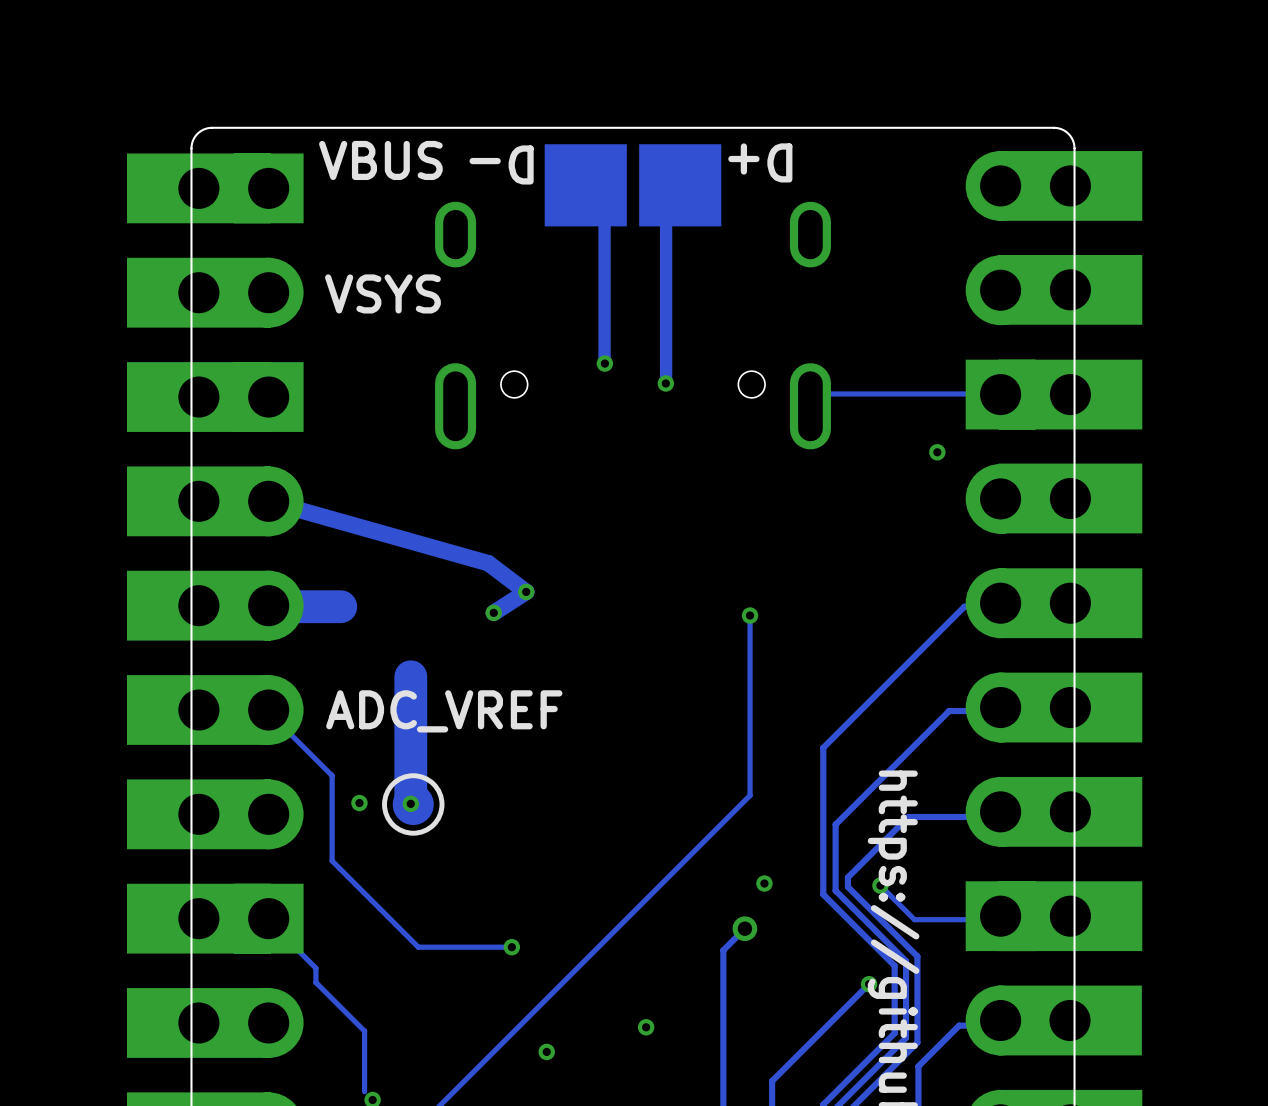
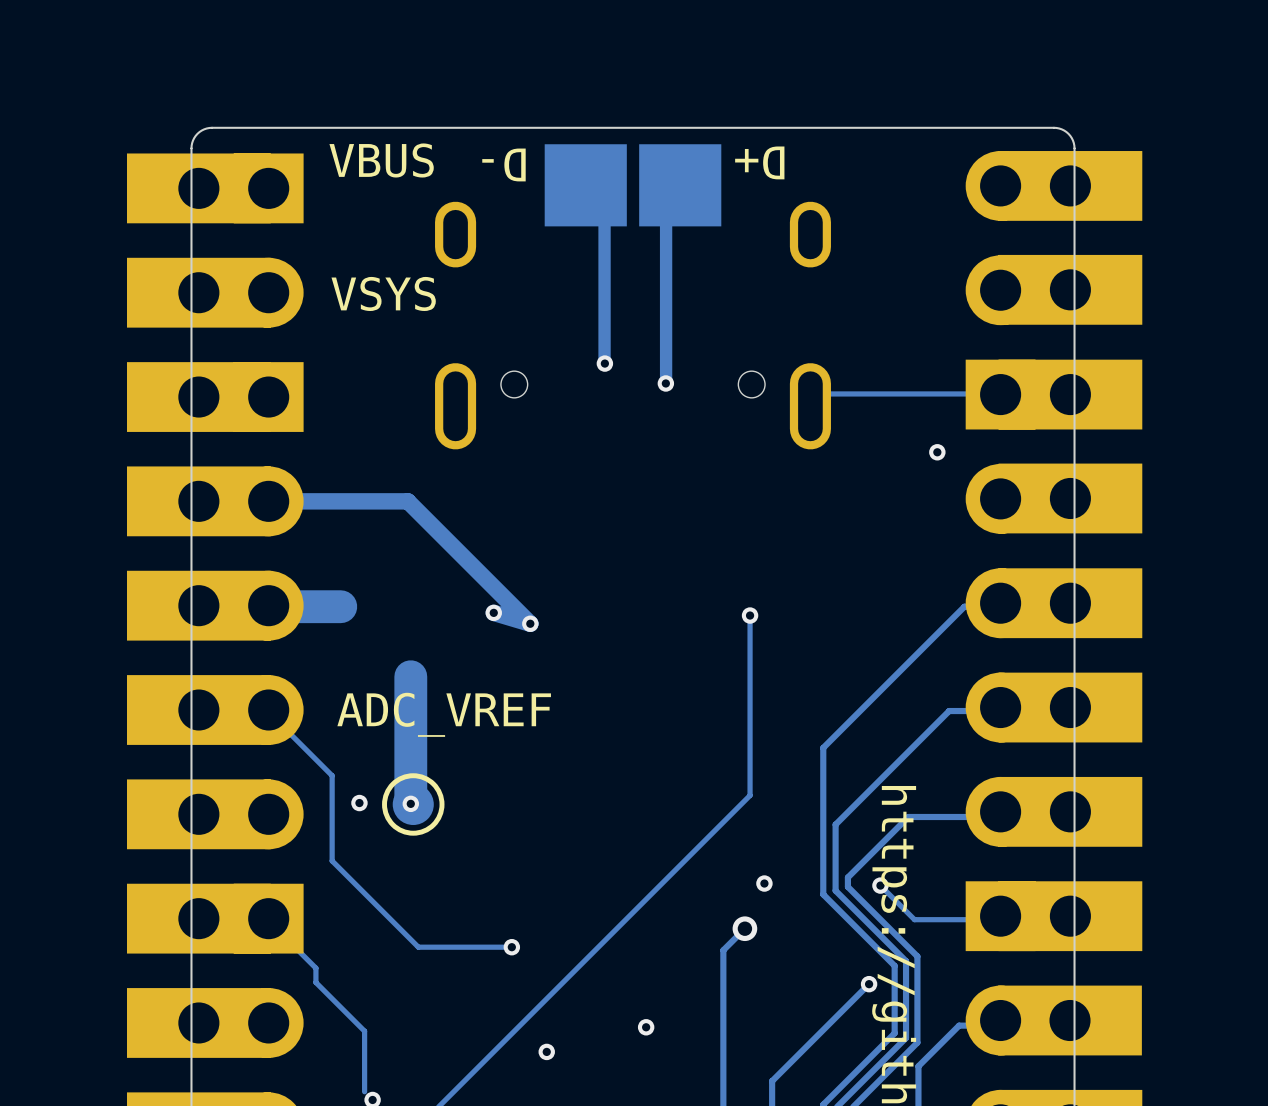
track: (268, 501) (488, 563) (526, 591) (493, 612) -> (268, 501) (407, 501) (530, 623) (493, 612)
via position: (526, 591) -> (530, 623)

